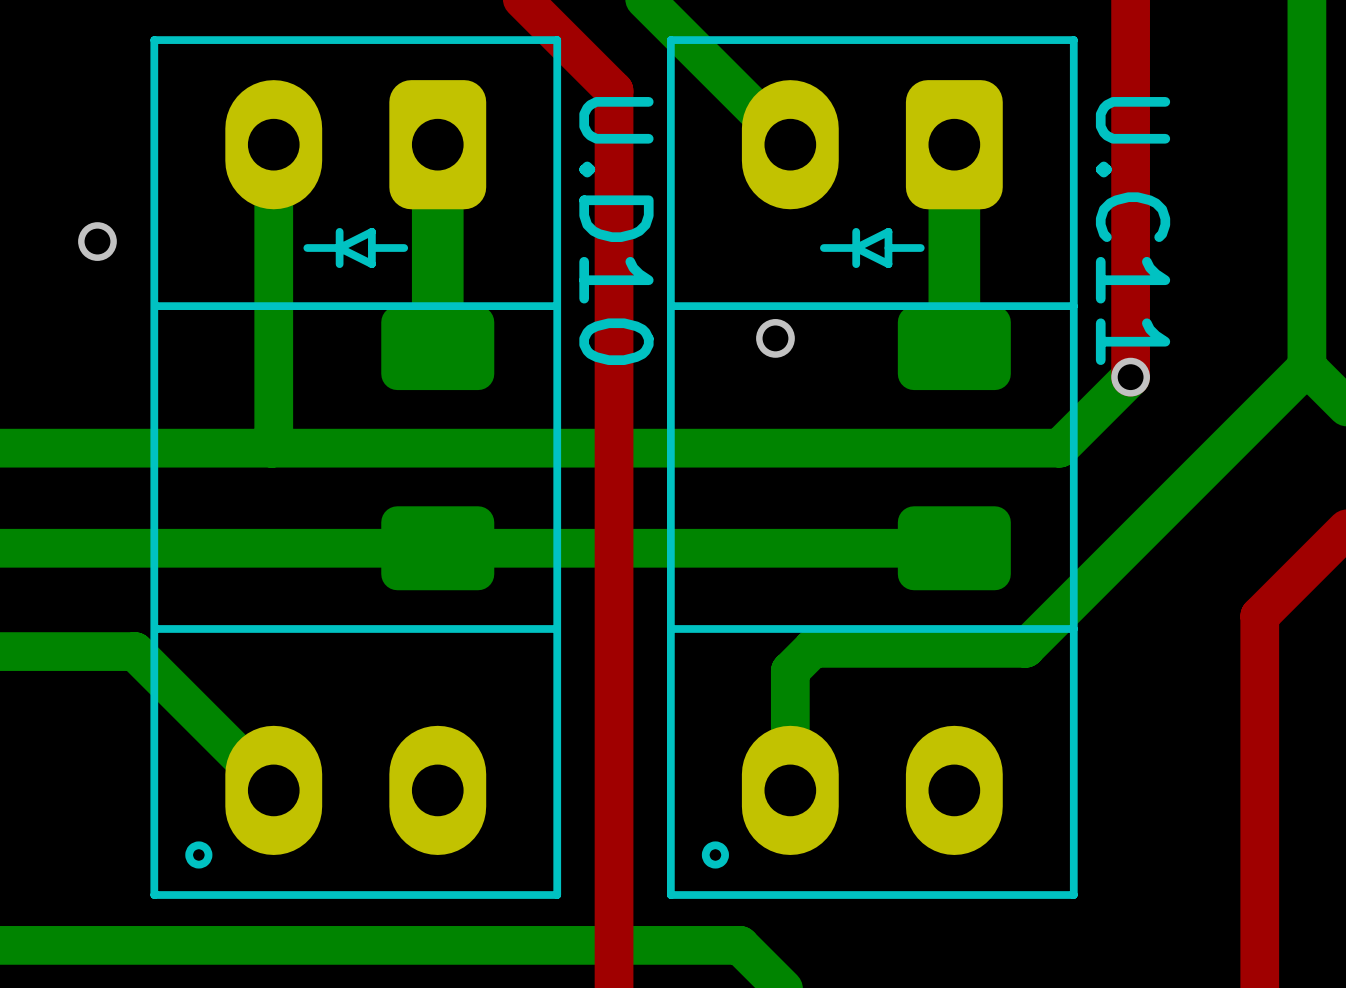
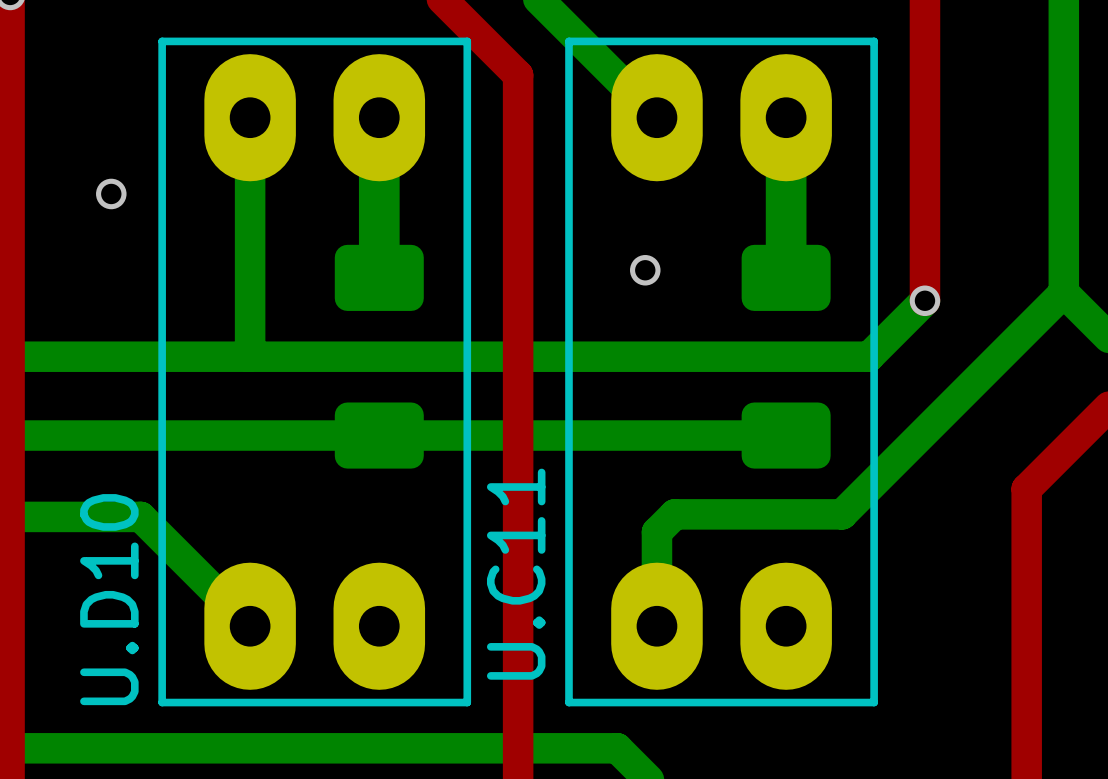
U.D10 footprint: [150, 36, 562, 899] -> [158, 37, 472, 707]
U.C11 footprint: [666, 36, 1078, 899] -> [565, 37, 878, 707]
U.D10 name position: U.D10 (616, 231) -> U.D10 (109, 599)
U.C11 name position: U.C11 (1133, 231) -> U.C11 (516, 574)

